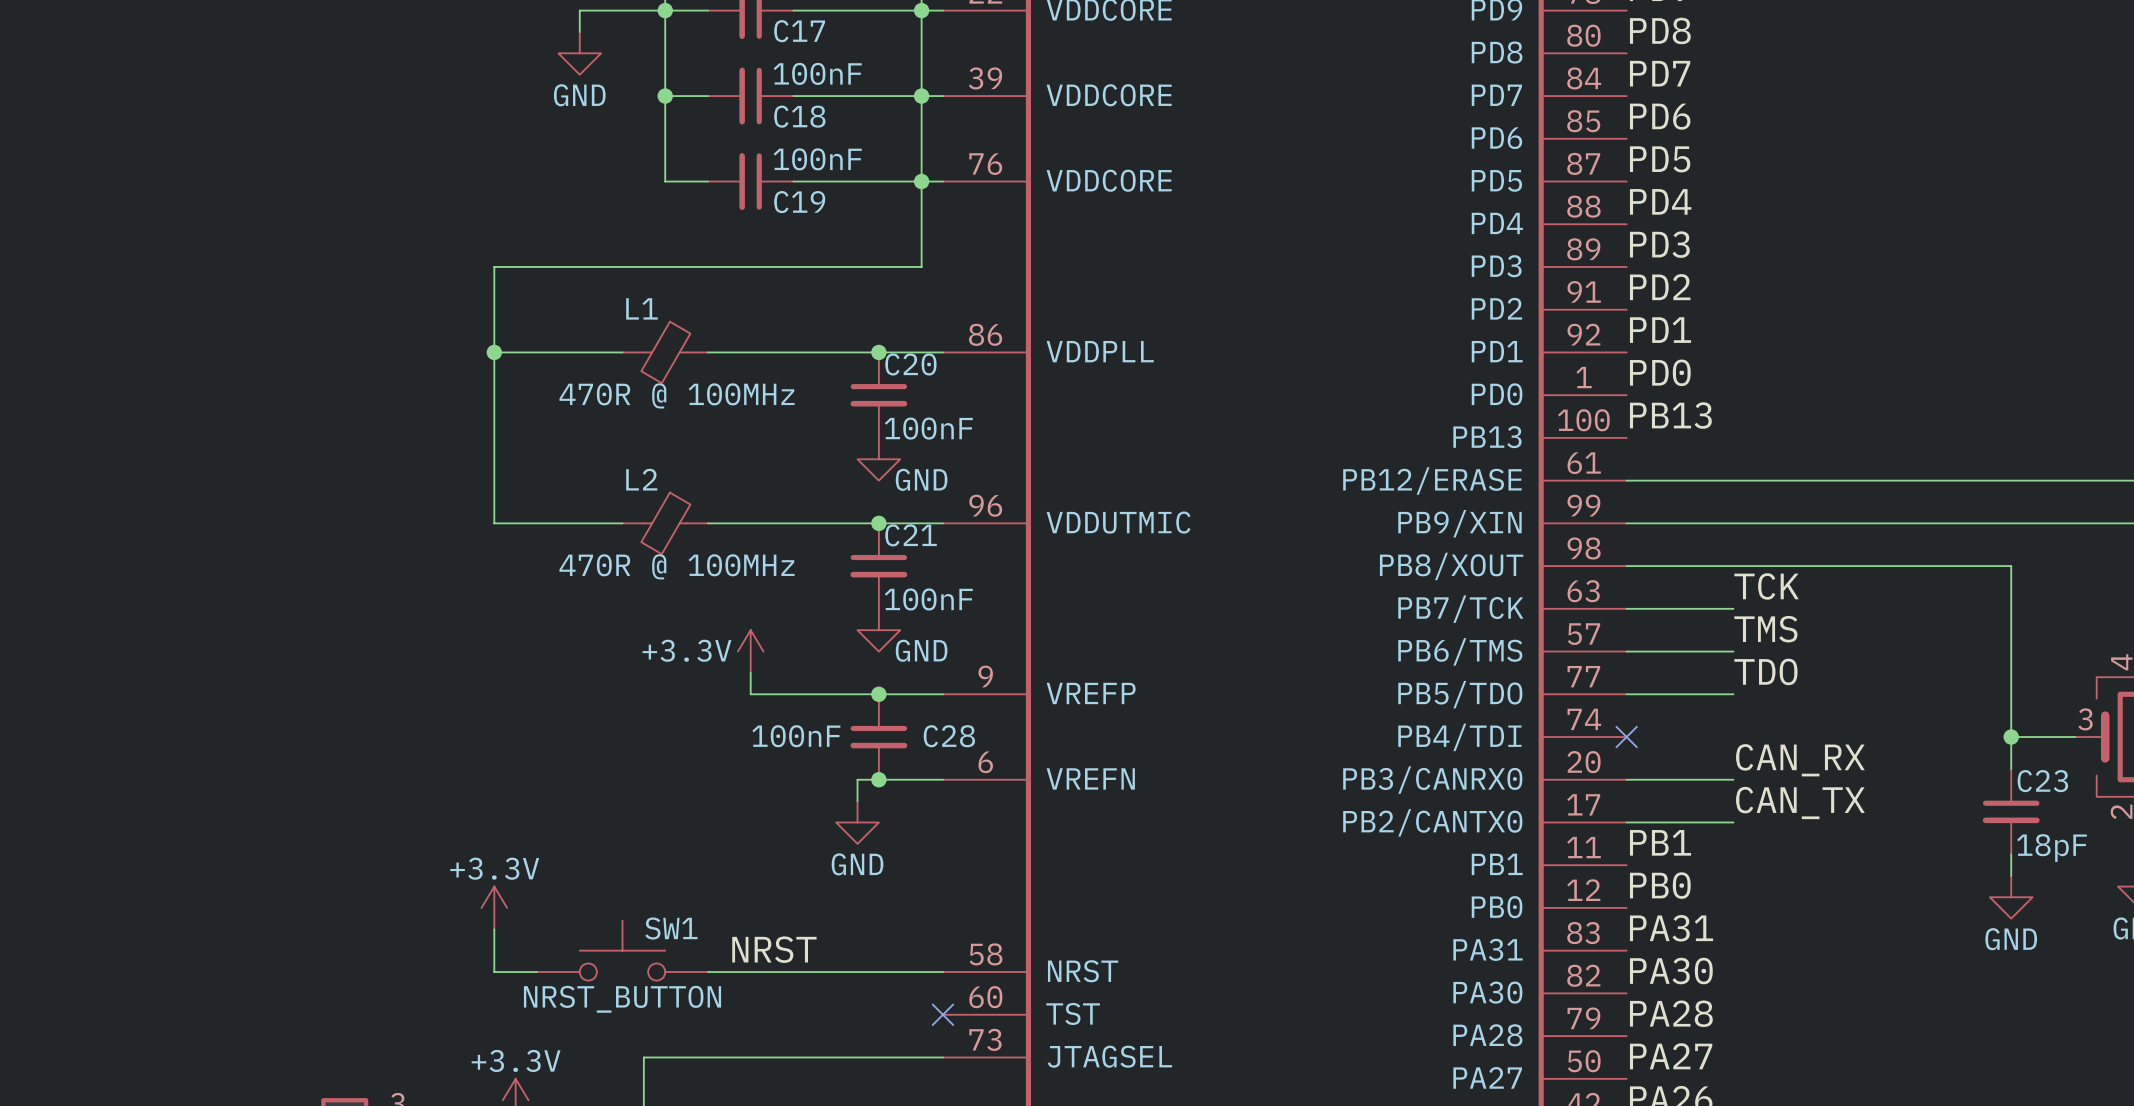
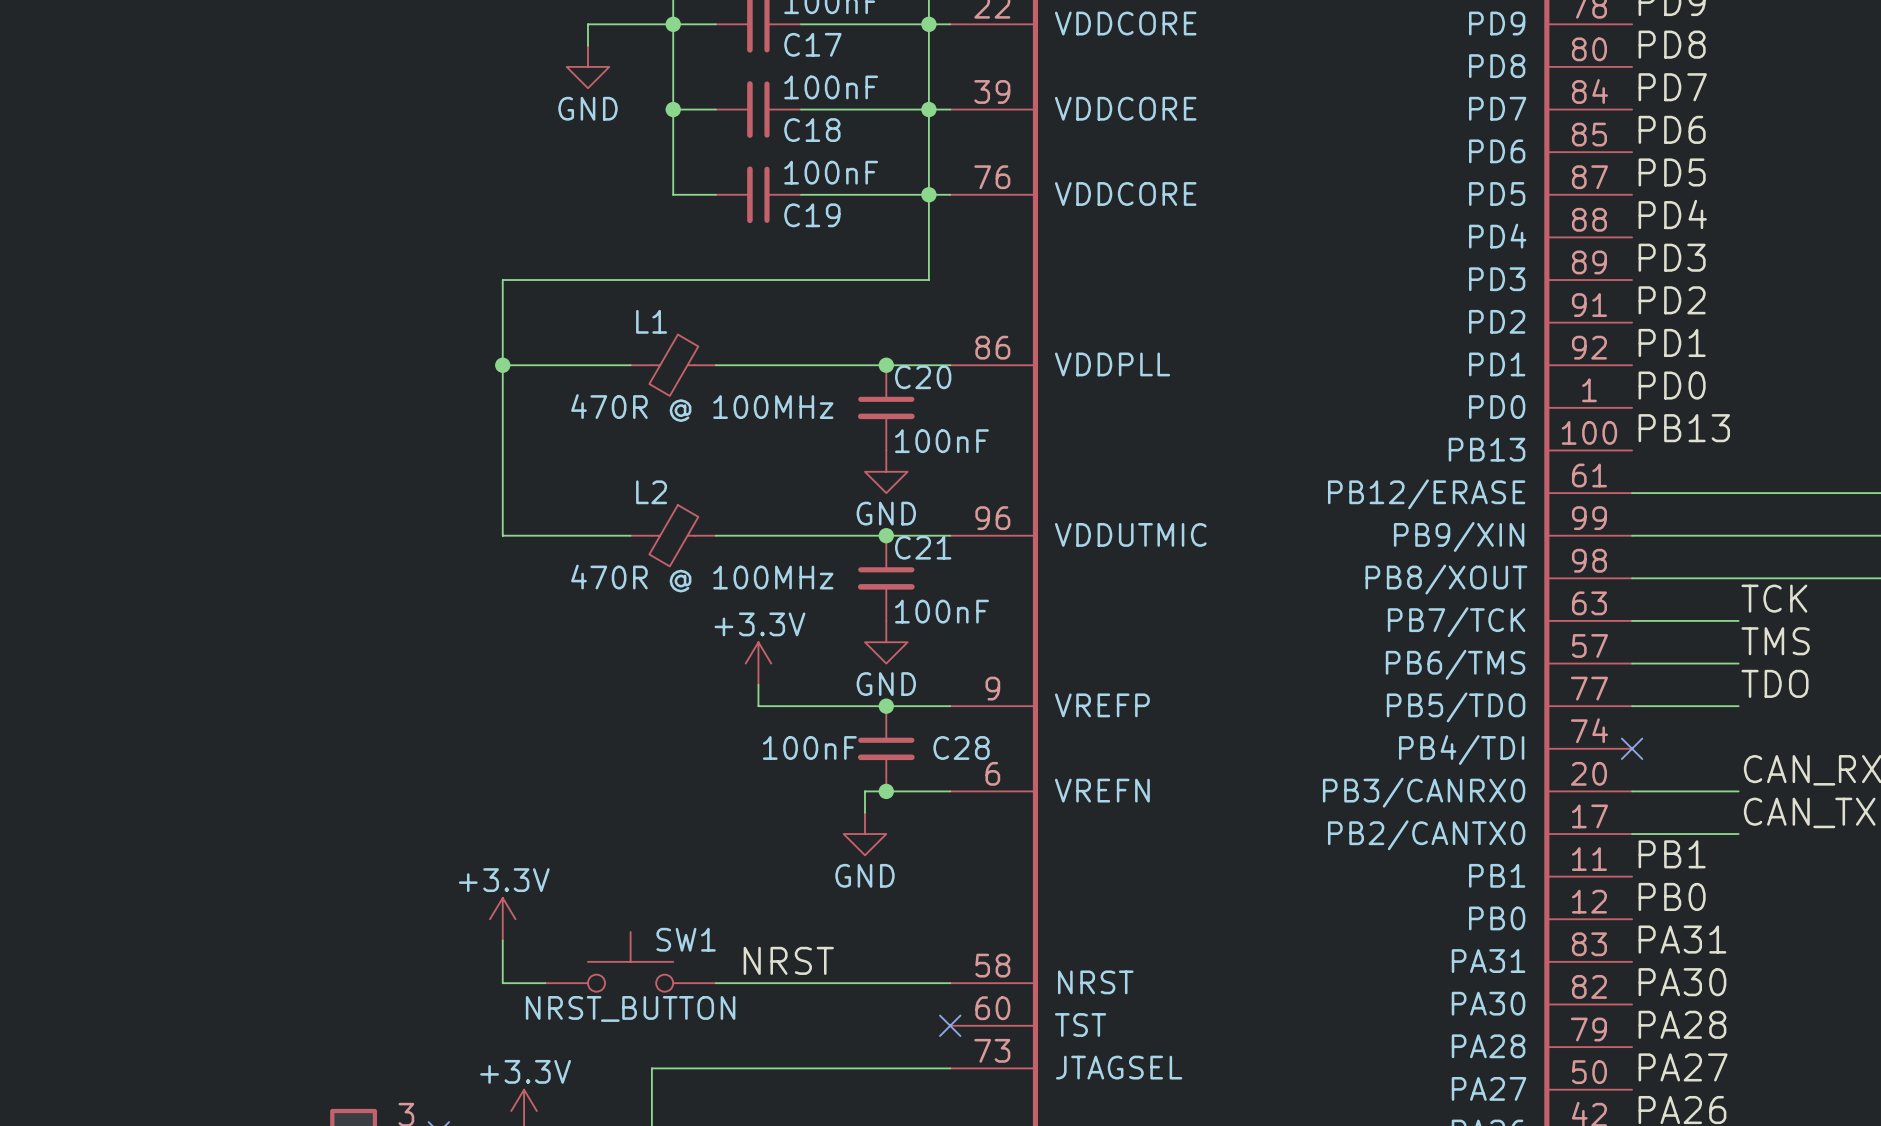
power symbol text position: GND (921, 479) -> GND (886, 513)
power symbol text position: +3.3V (686, 650) -> +3.3V (759, 624)
power symbol text position: GND (921, 650) -> GND (886, 684)

